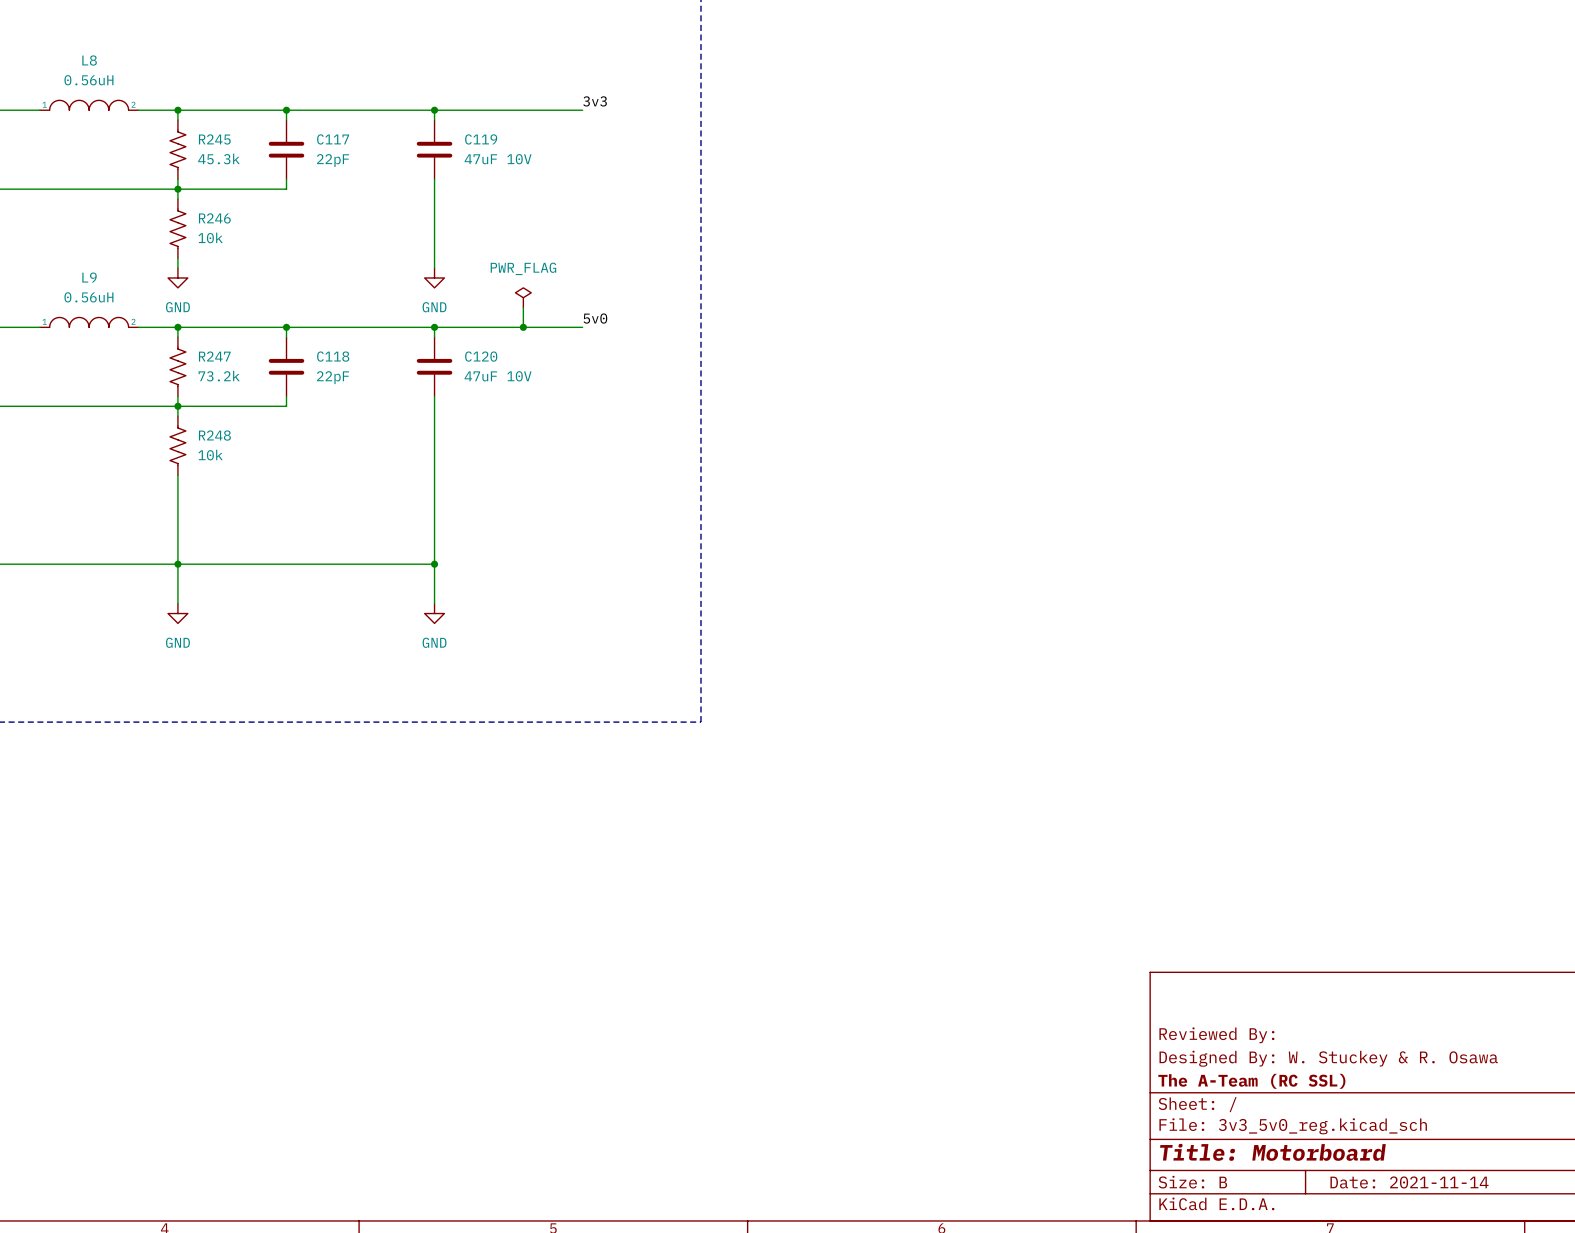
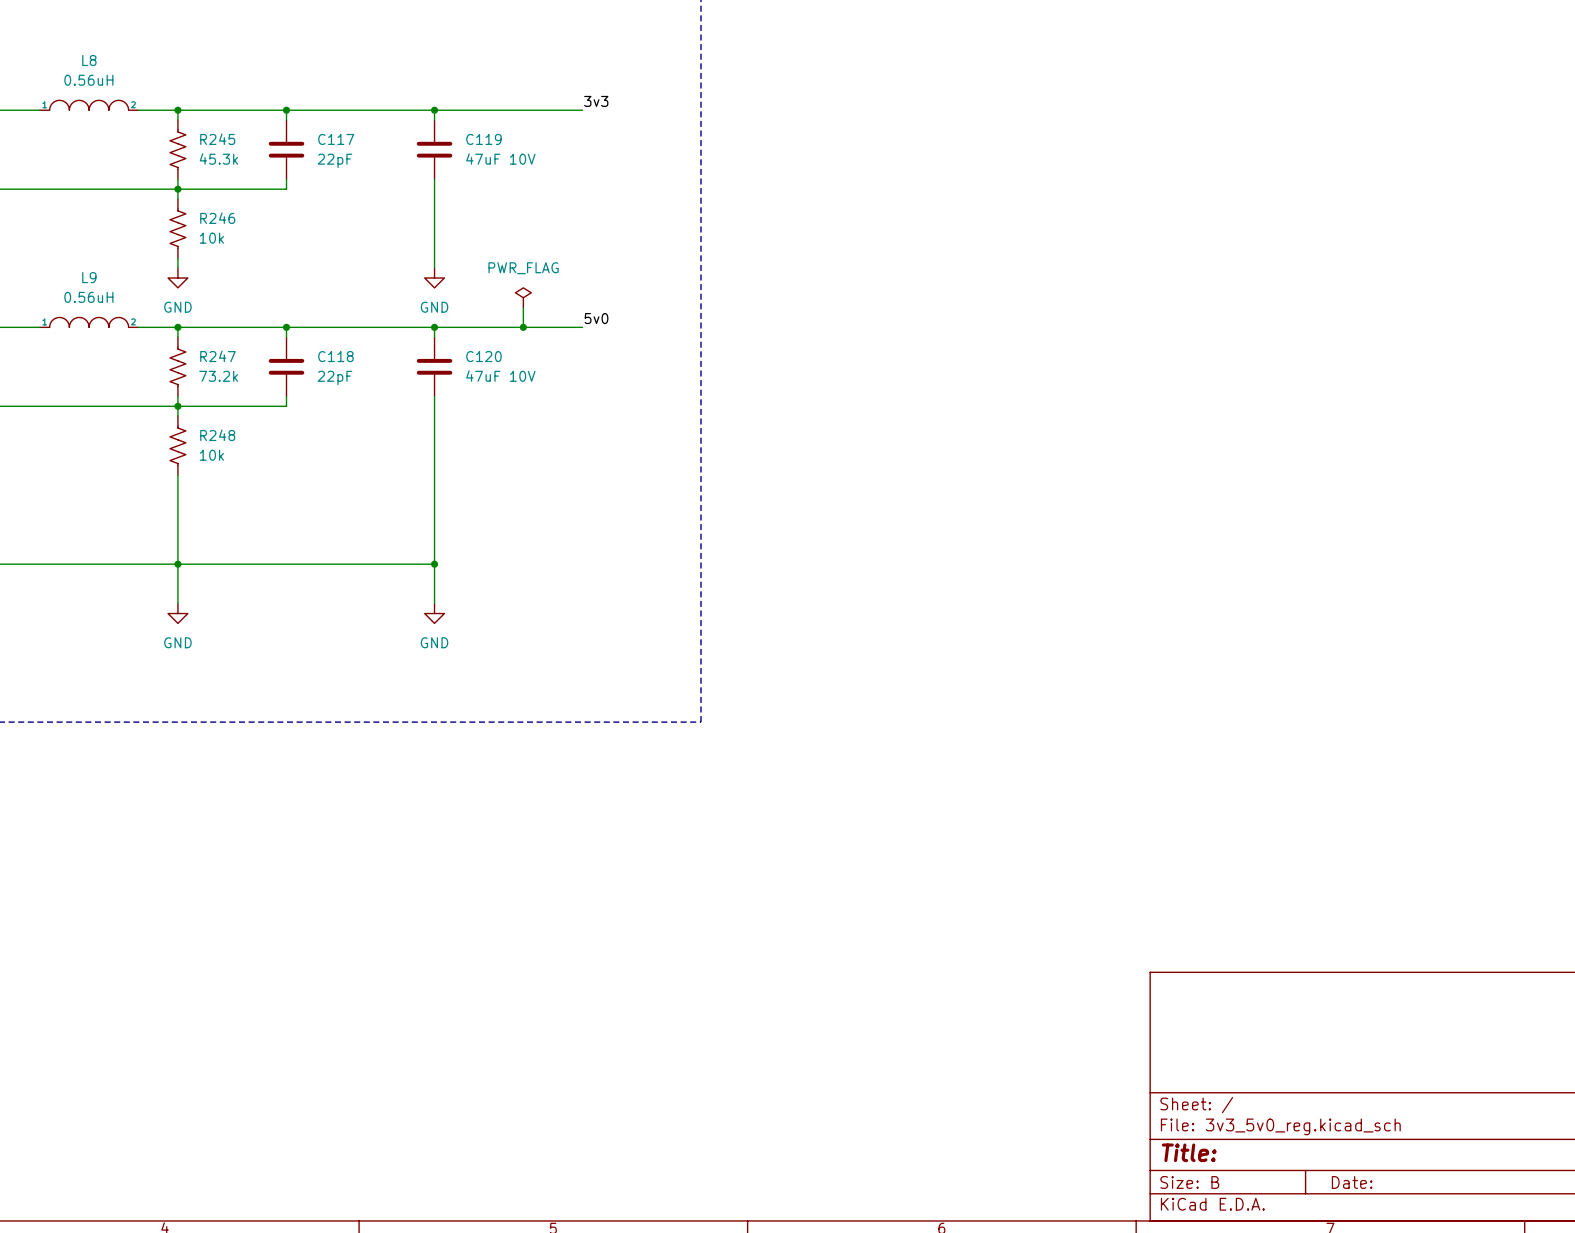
title block: Reviewed By: (1216, 1035) -> none
title block: Designed By: W. Stuckey & R. Osawa (1328, 1058) -> none
title block: The A-Team (RC SSL) (1251, 1081) -> none
title block: Title: Motorboard (1272, 1152) -> Title: (1189, 1152)
title block: Date: 2021-11-14 (1409, 1182) -> Date: (1352, 1182)

